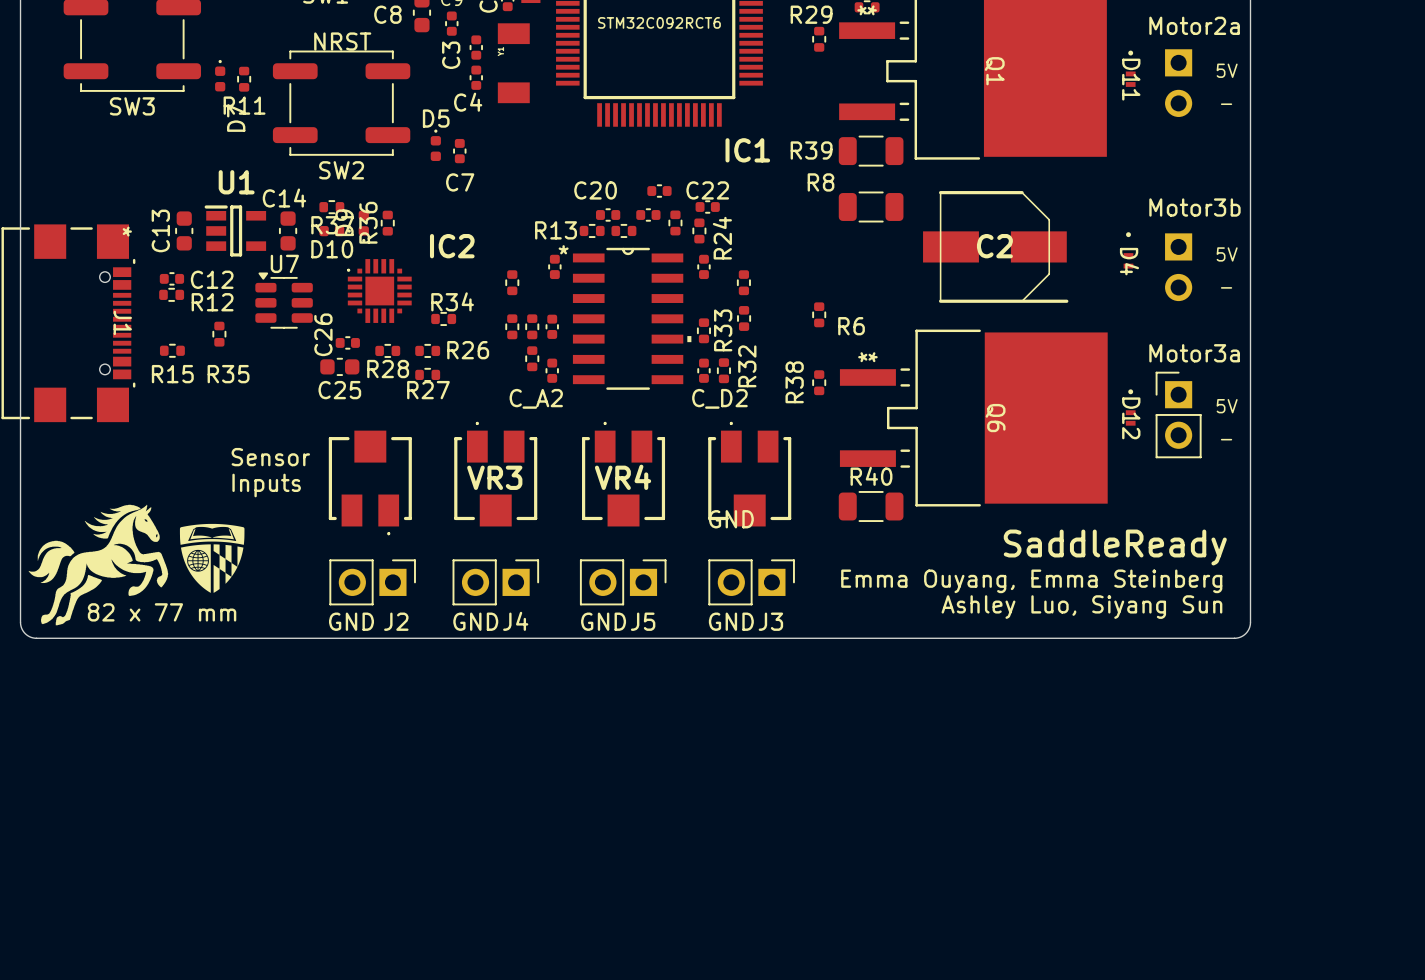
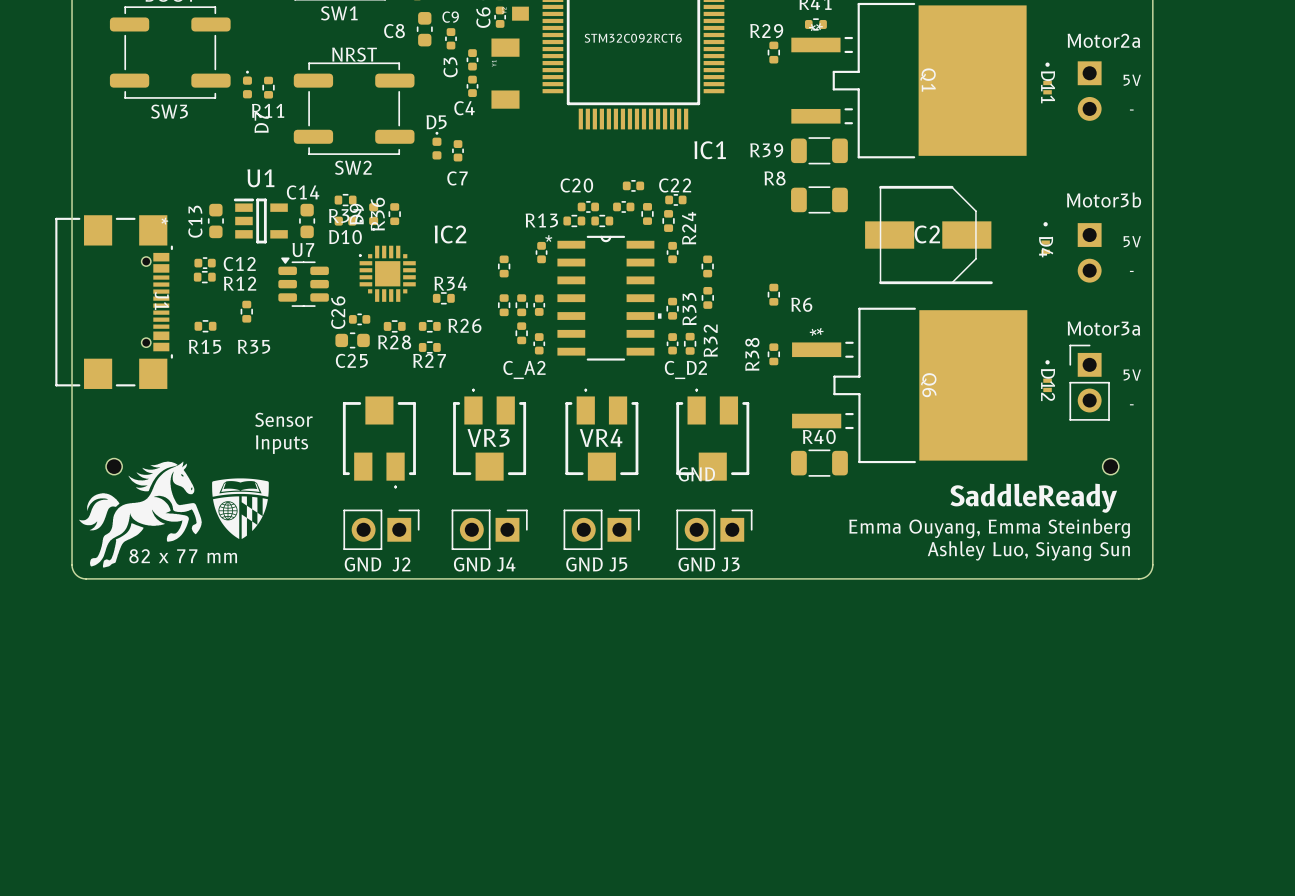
part: none -> (114, 466)
part: none -> (1110, 466)

